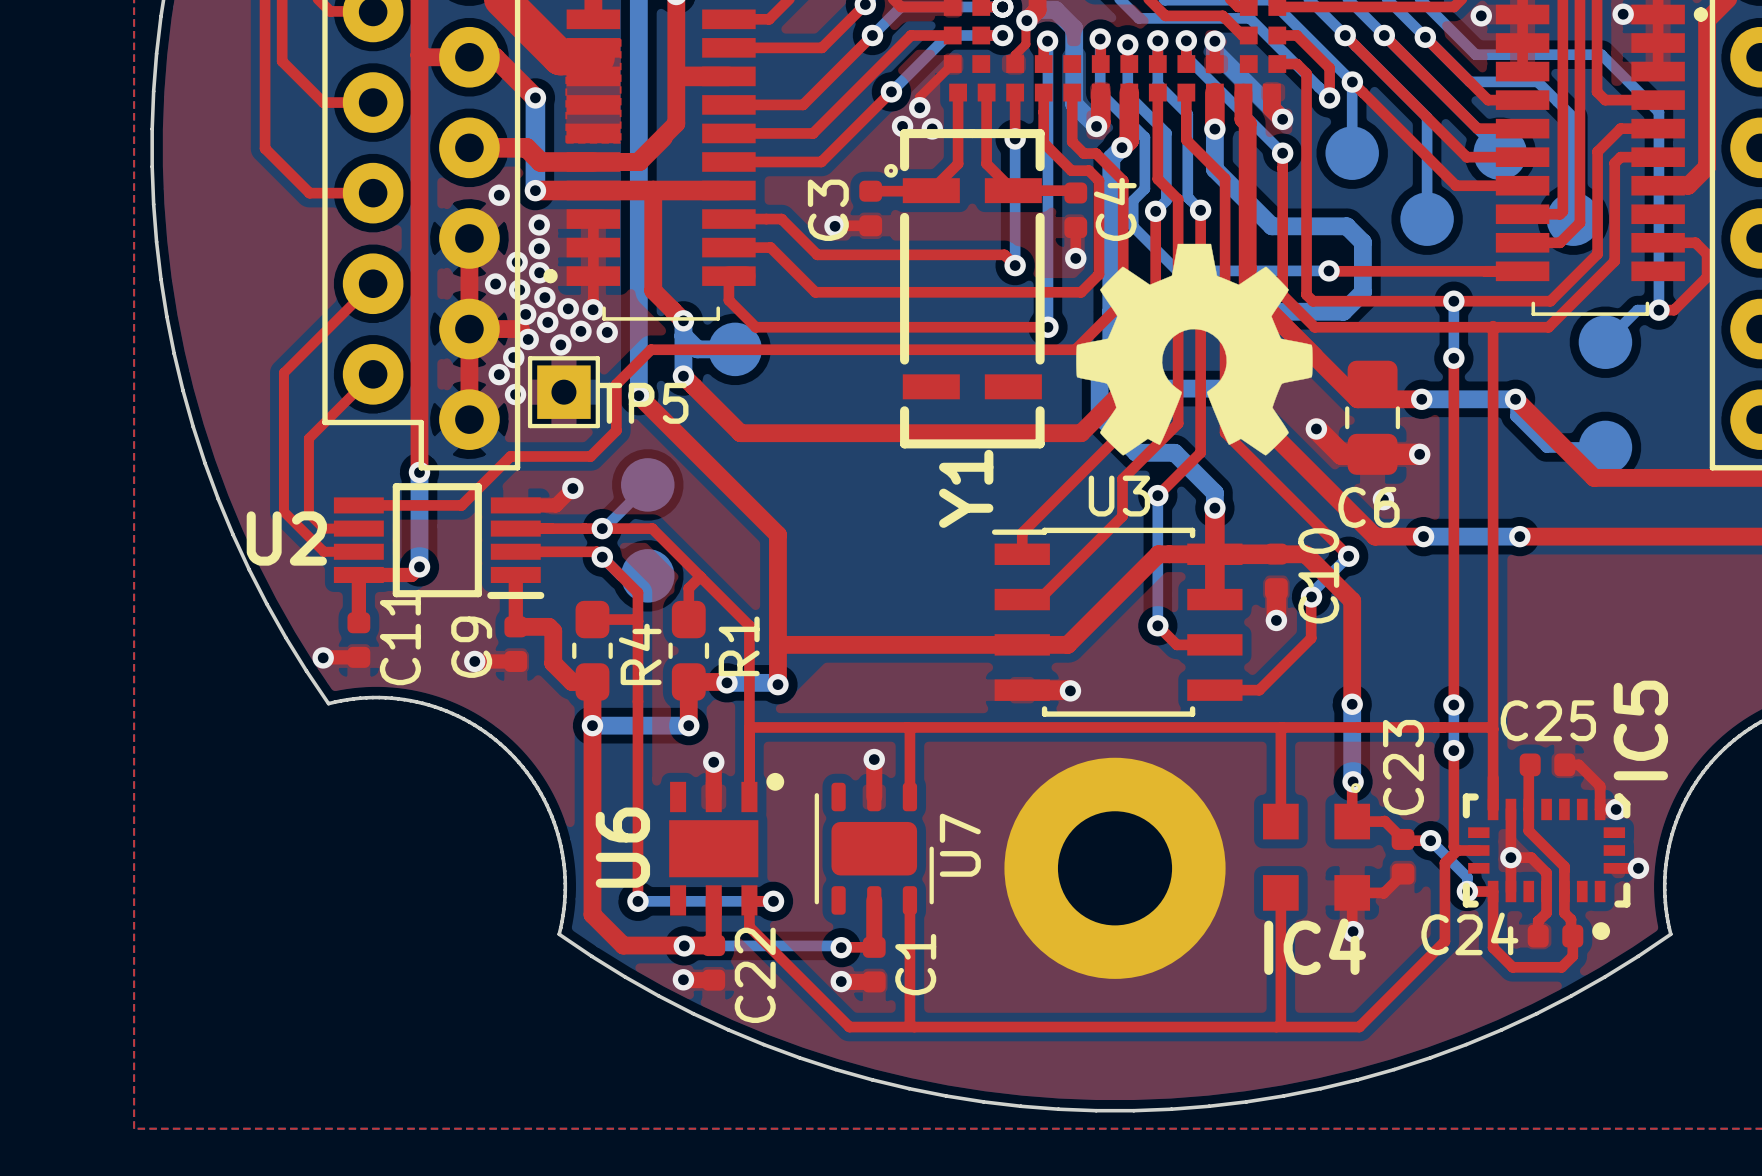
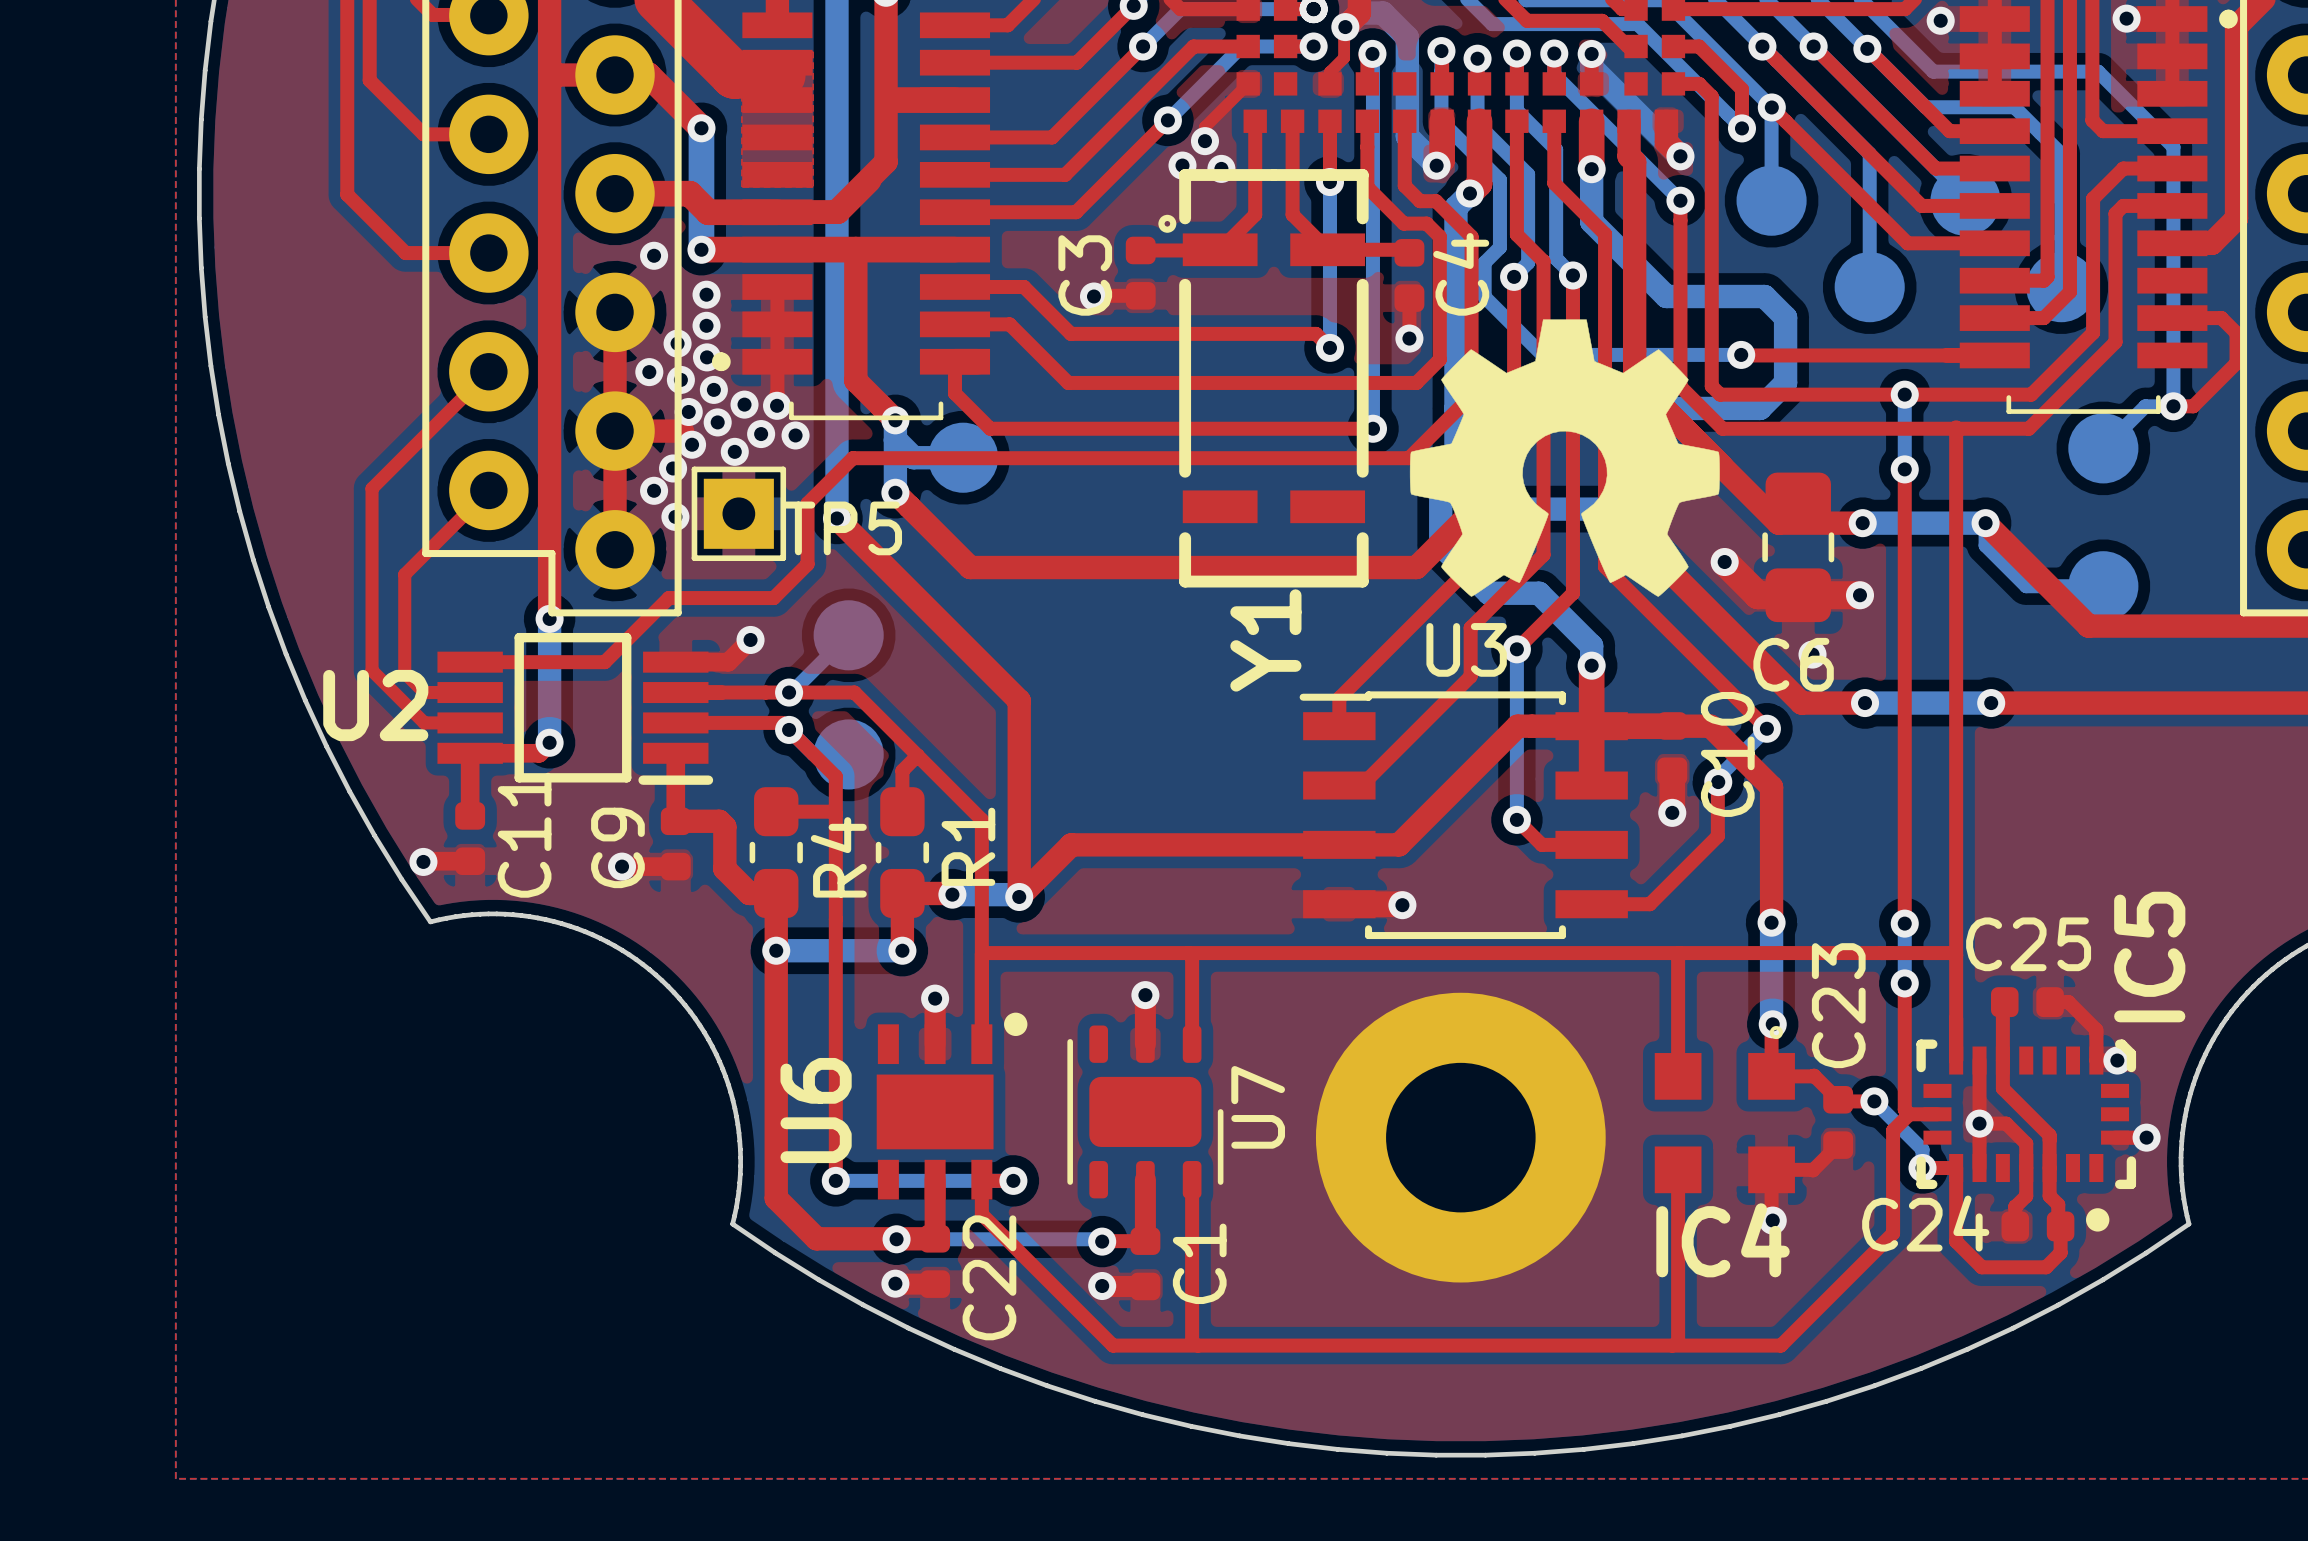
top track: (817, 644) (782, 644) (777, 648) -> (1071, 844) (1019, 896)

